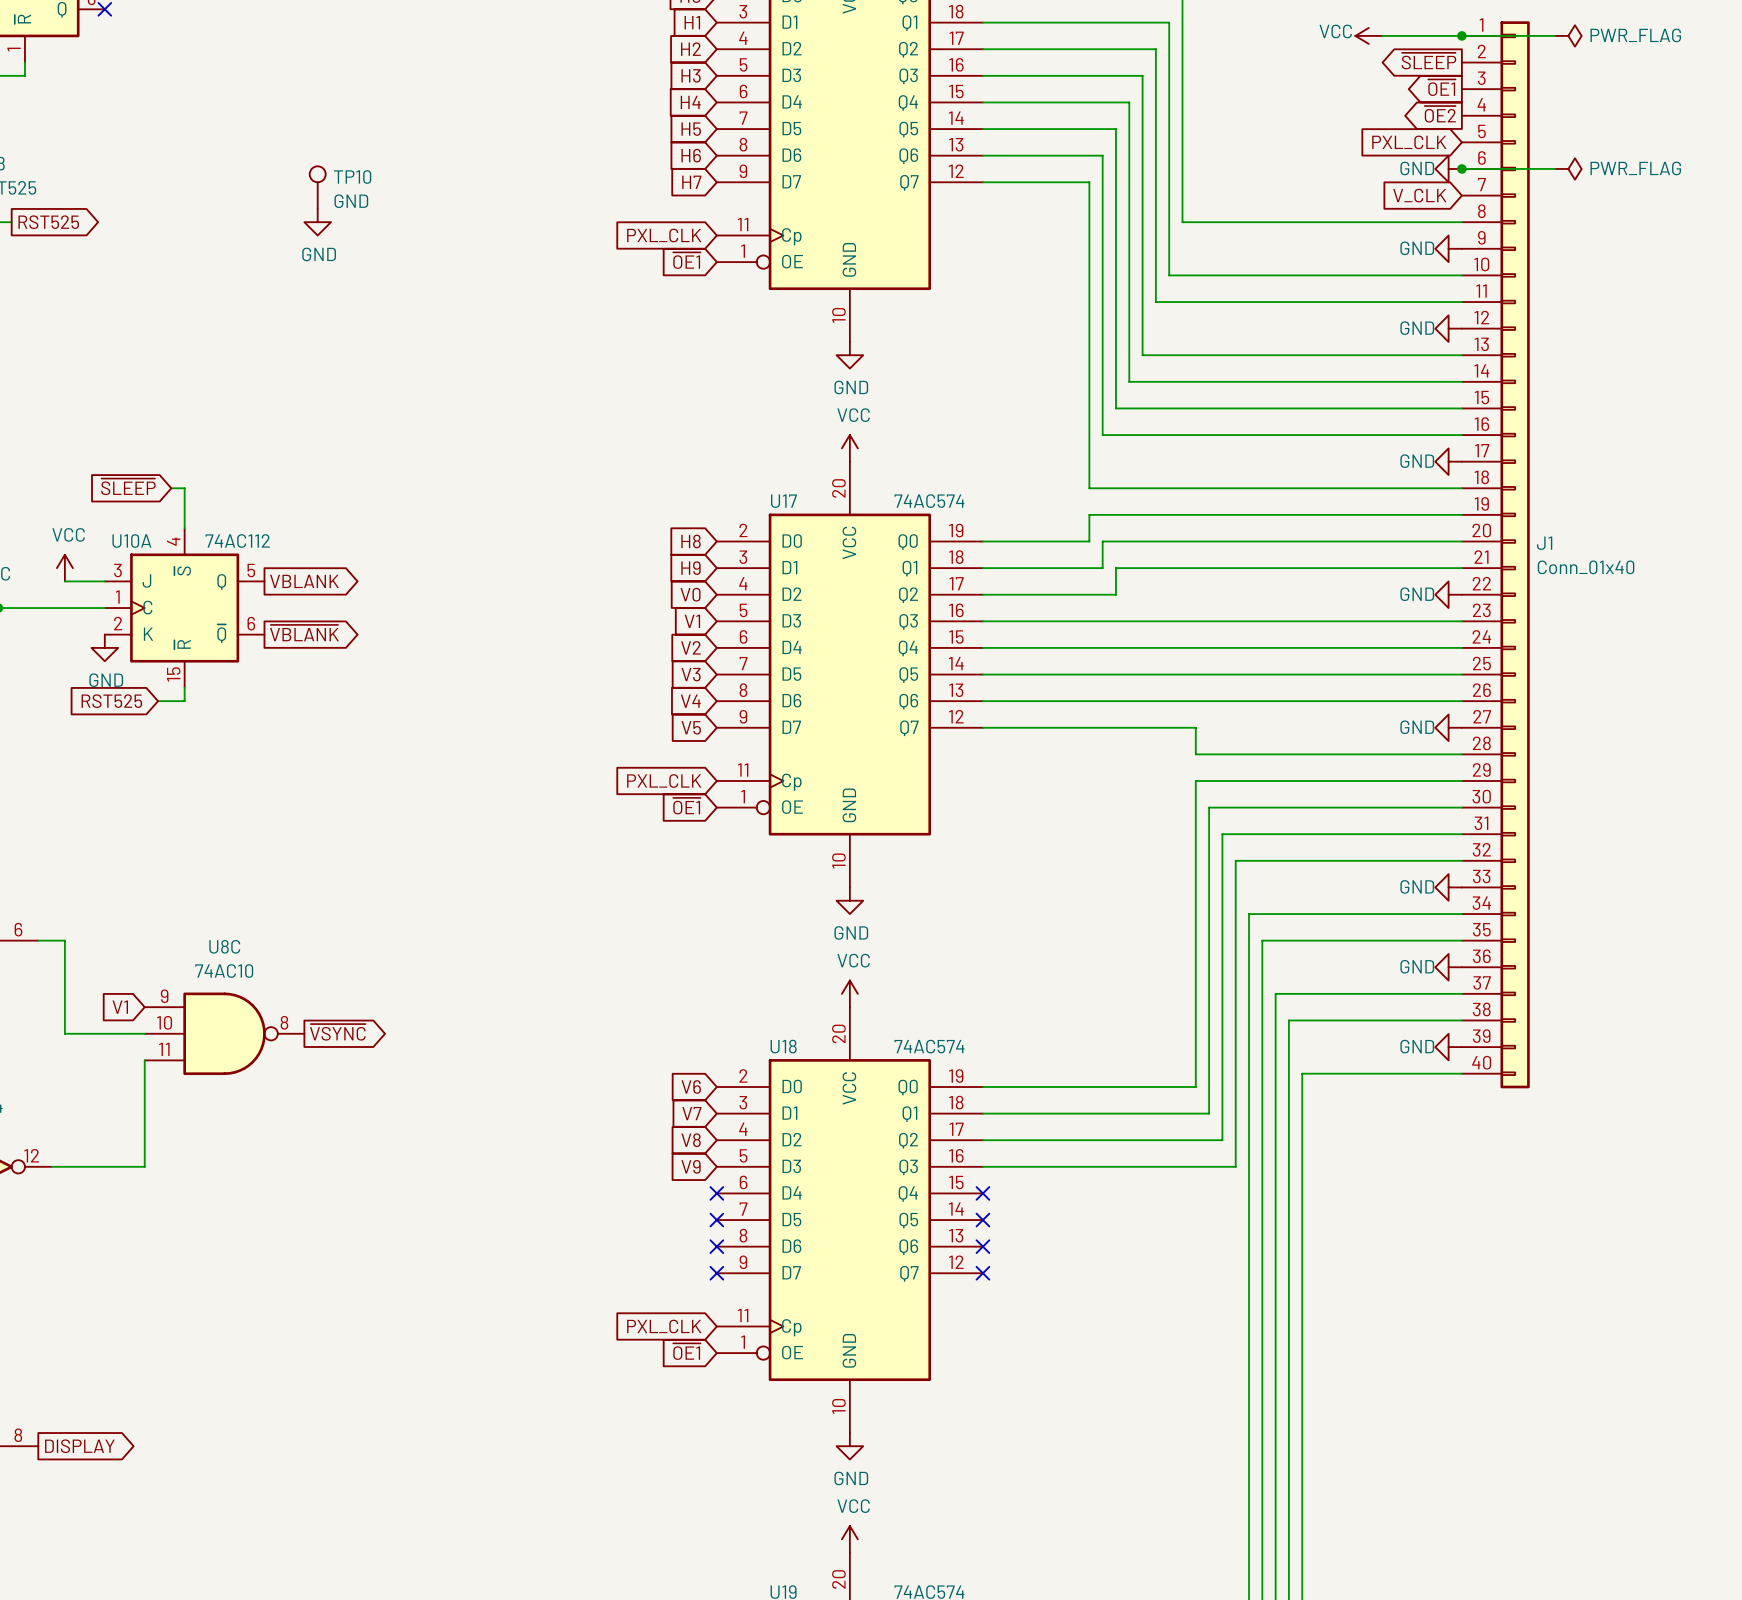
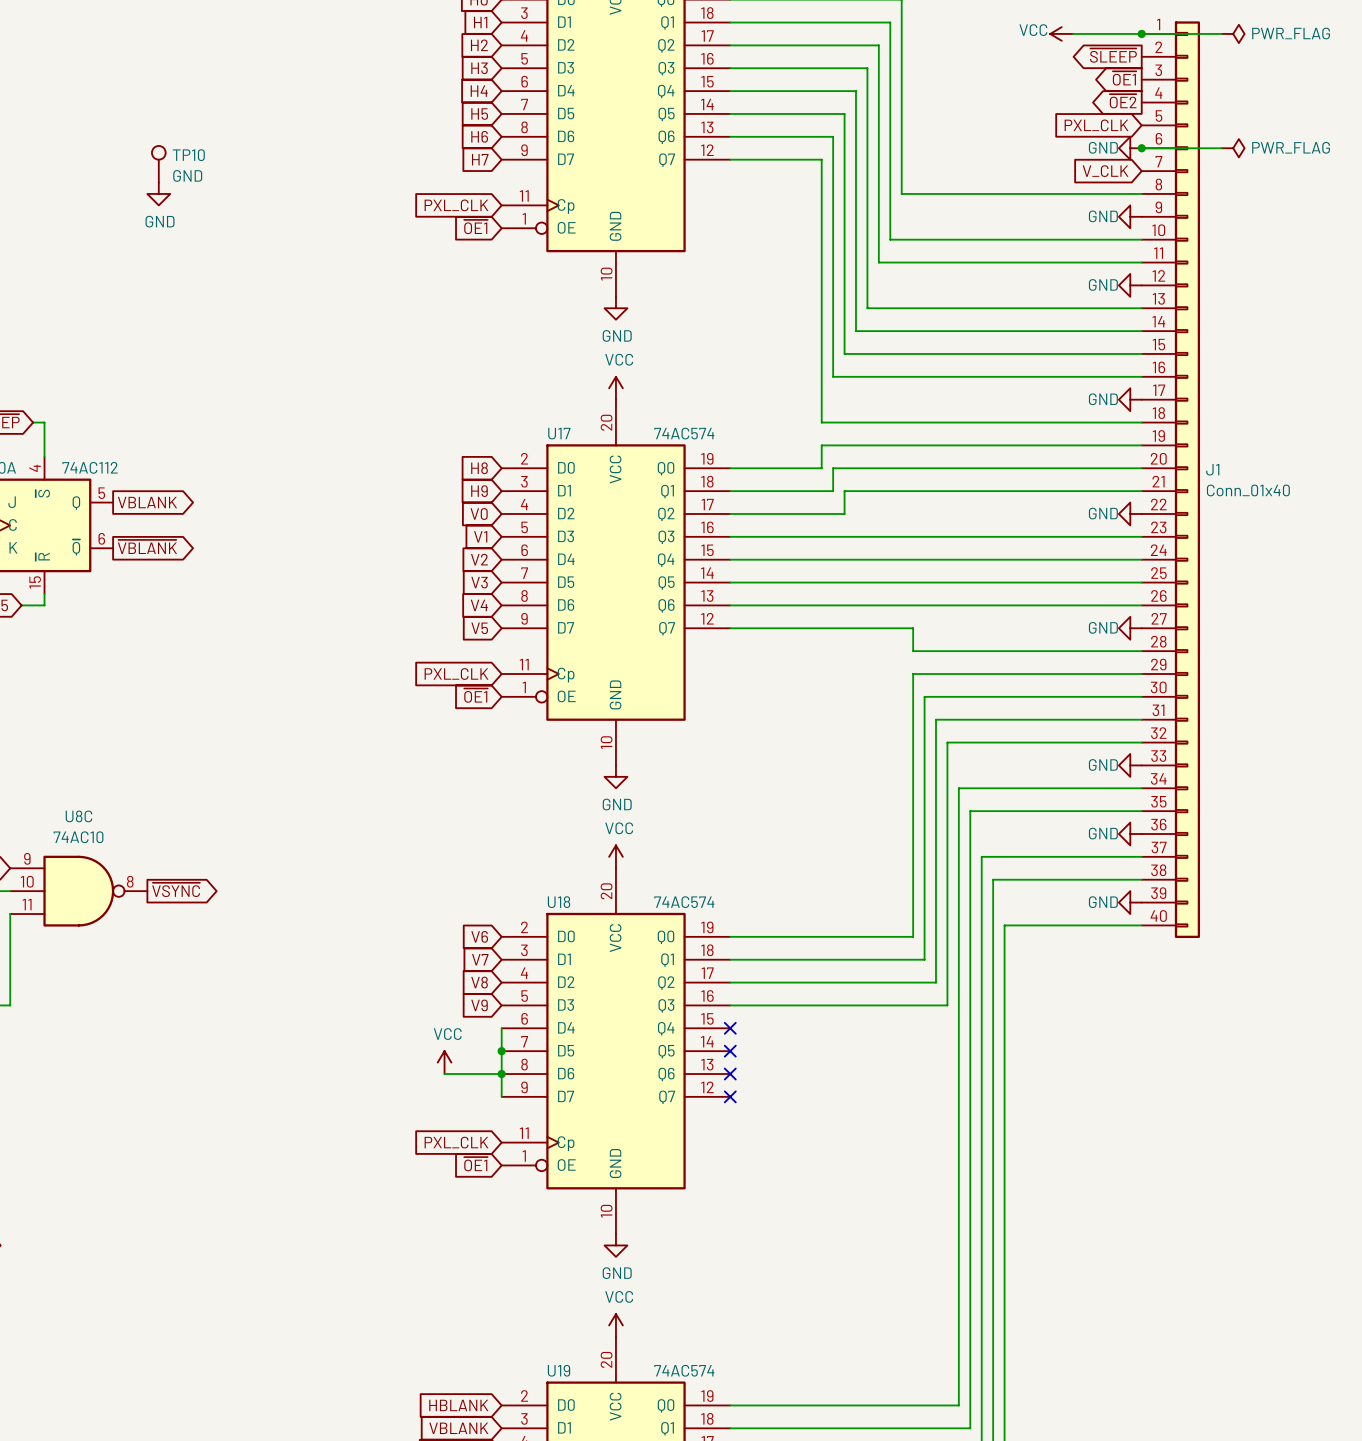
wire: none -> (501, 1028) (501, 1096)
no-connect mark: (716, 1193) -> none
no-connect mark: (716, 1220) -> none
junction: none -> (501, 1051)
power symbol: none -> VCC (444, 1062)
wire: none -> (444, 1074) (501, 1074)
no-connect mark: (716, 1246) -> none
junction: none -> (501, 1074)
no-connect mark: (716, 1273) -> none

